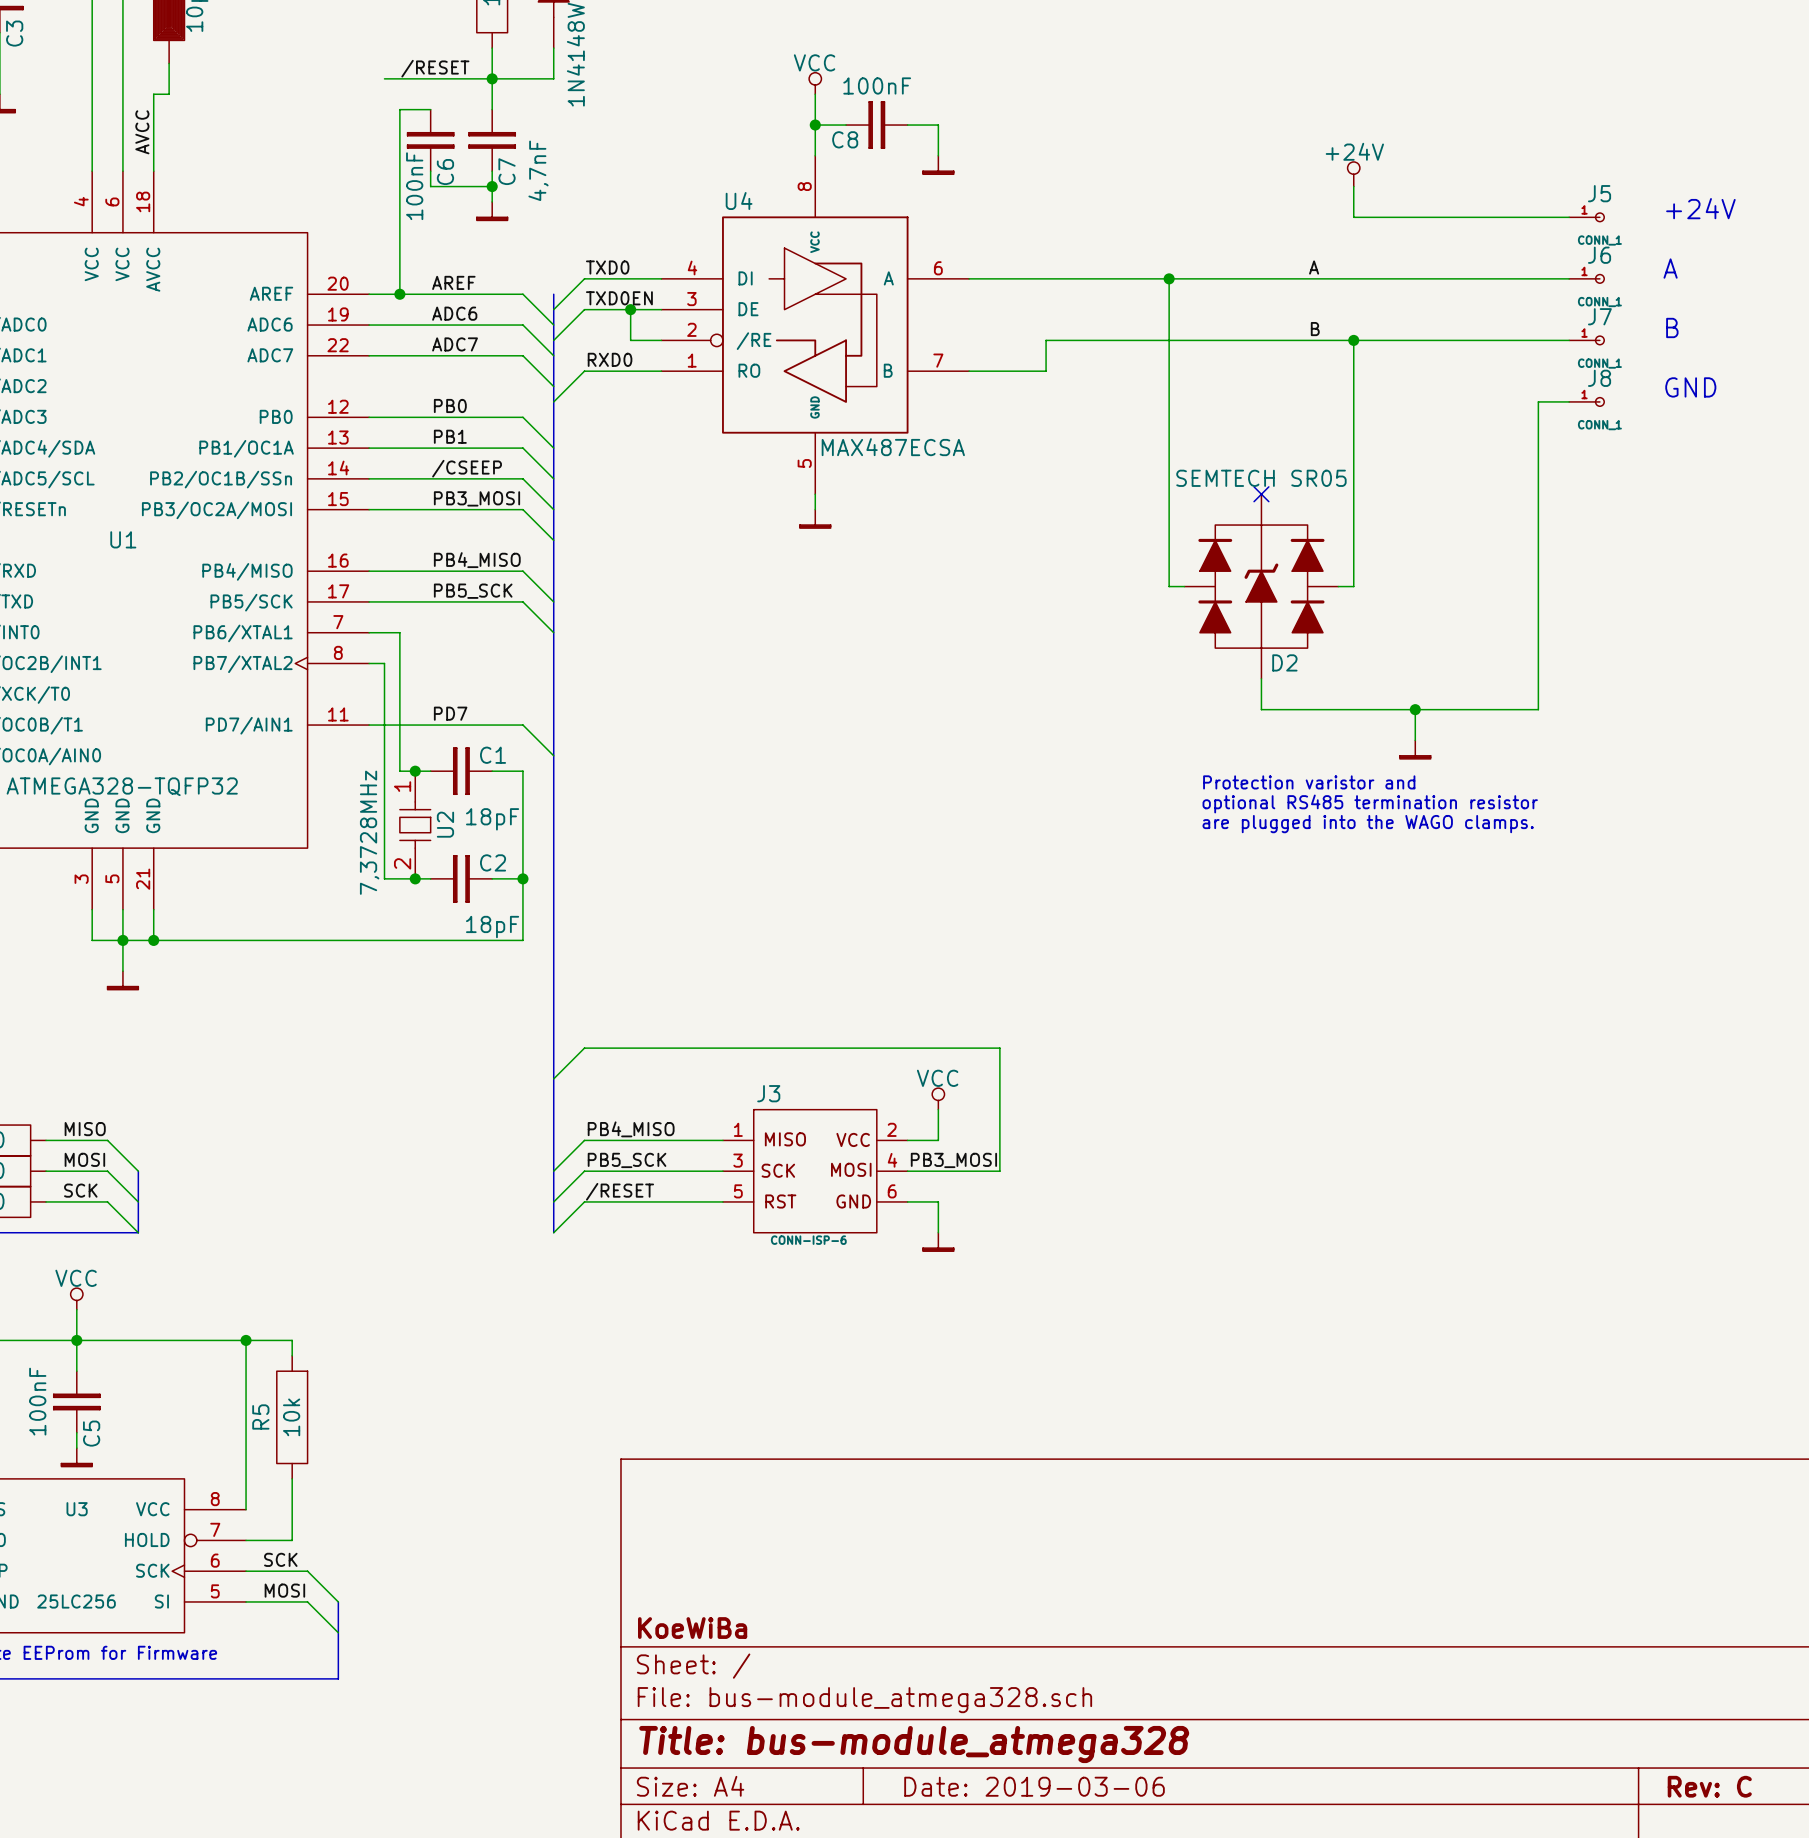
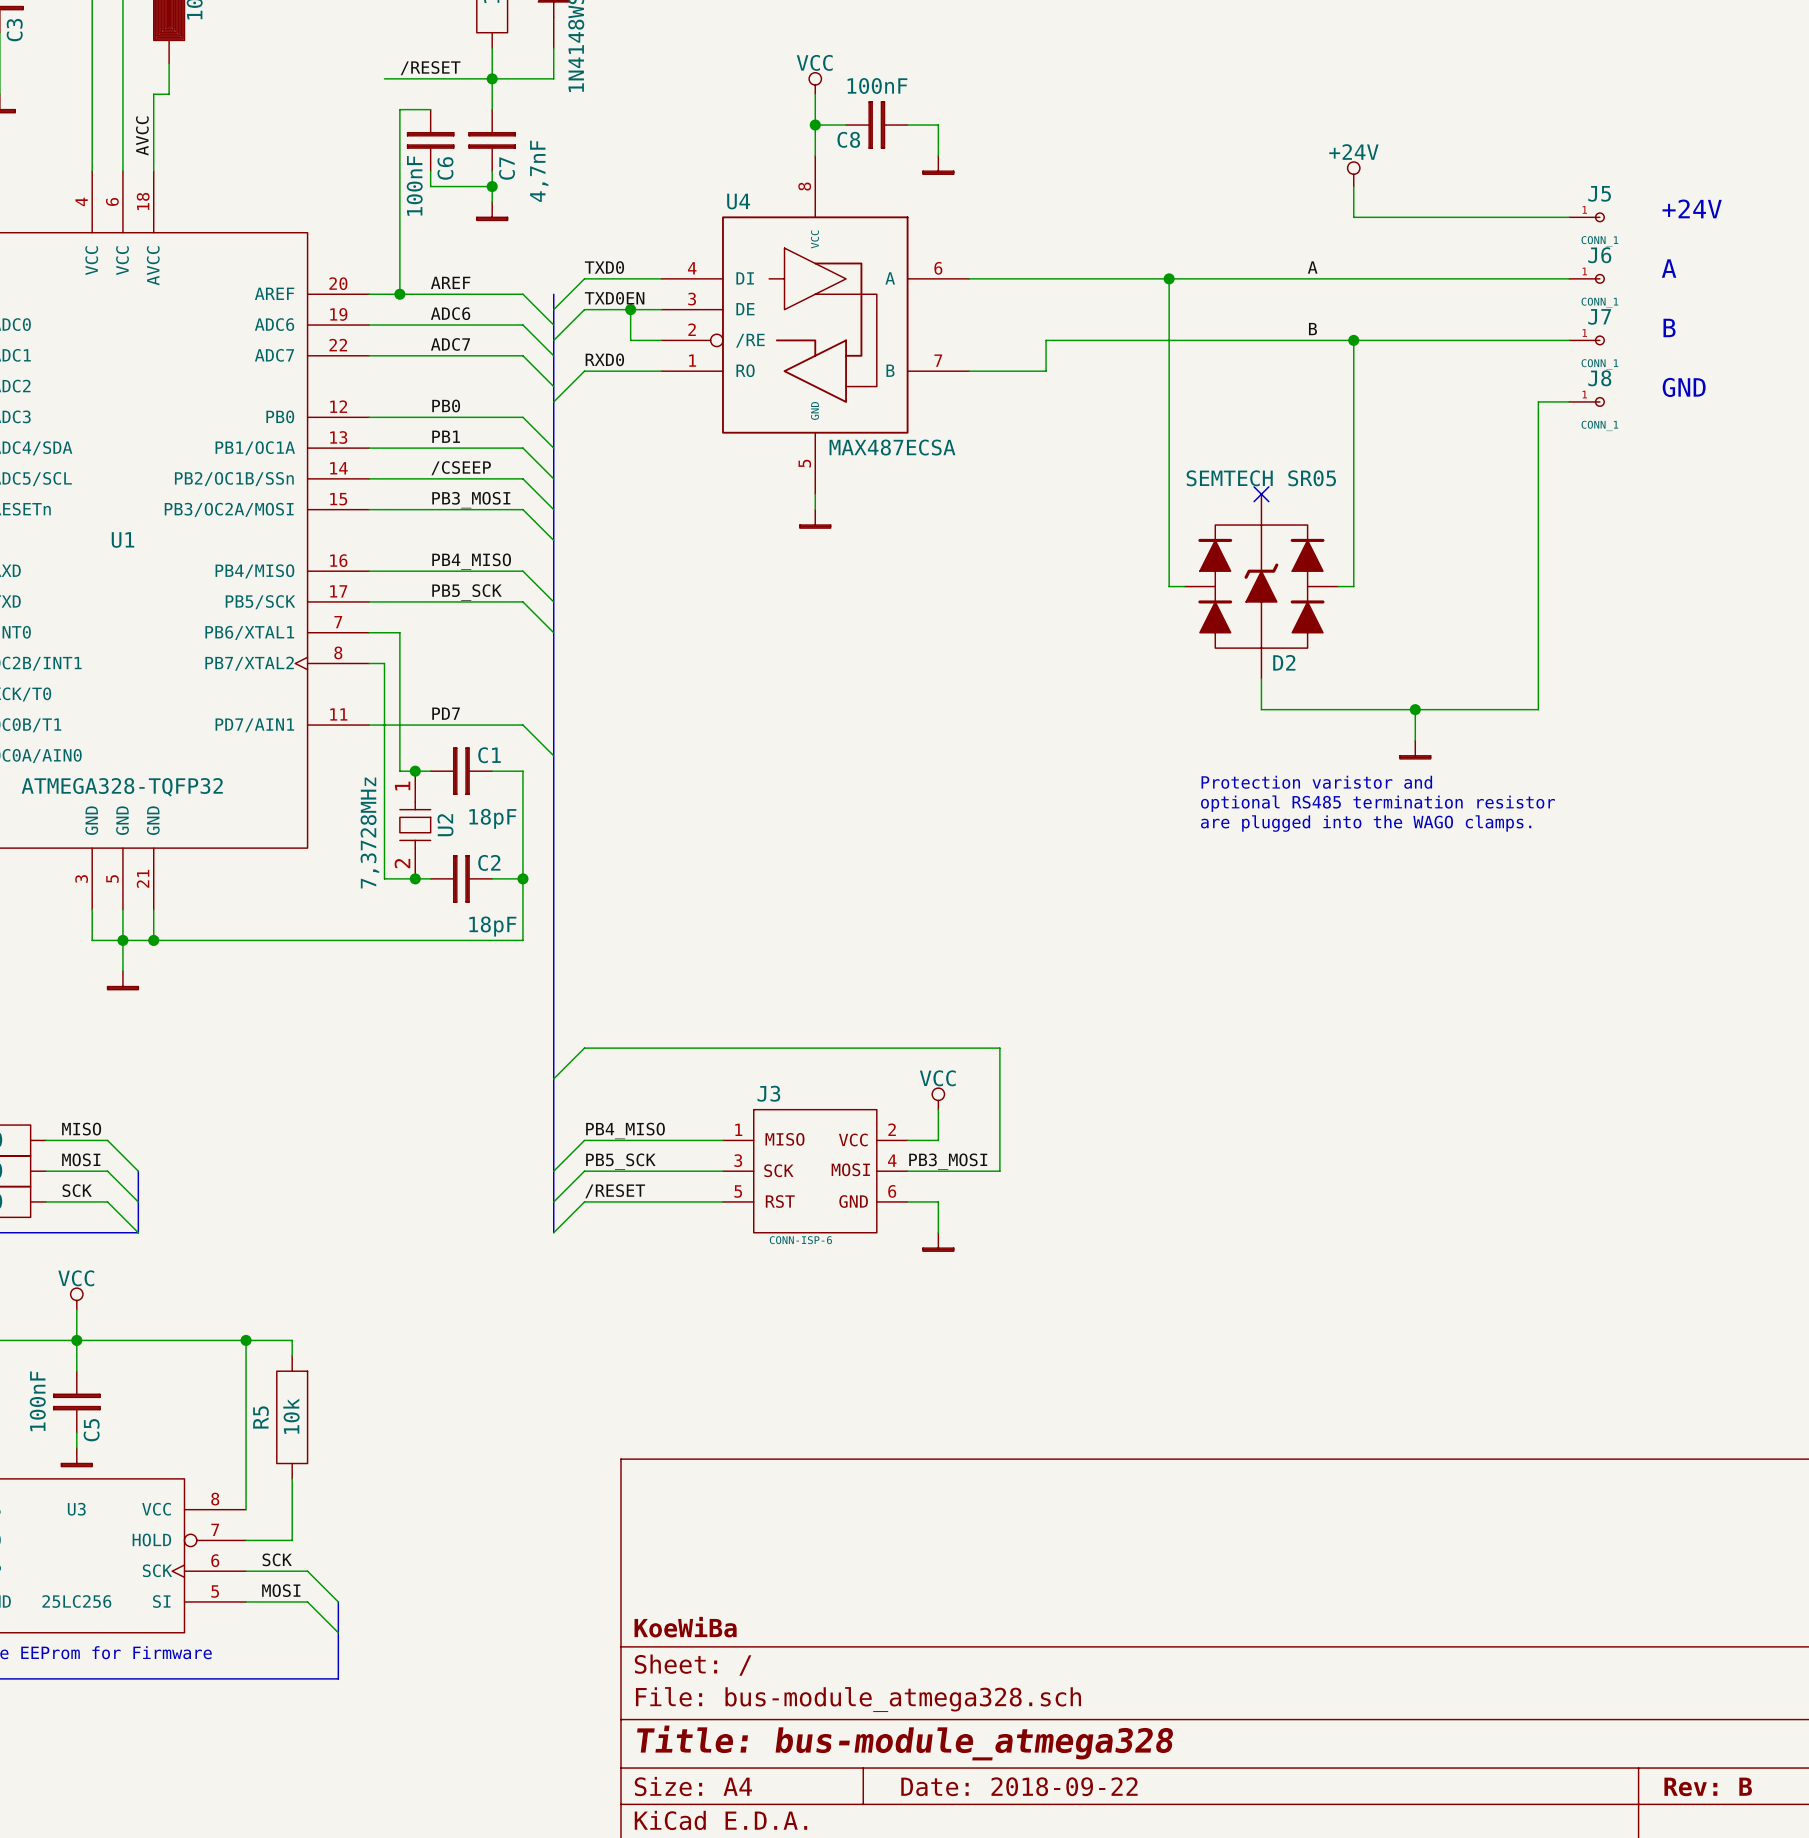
title block: Date: 2019-03-06 (1034, 1786) -> Date: 2018-09-22 (1019, 1786)
title block: Rev: C (1709, 1786) -> Rev: B (1708, 1786)

